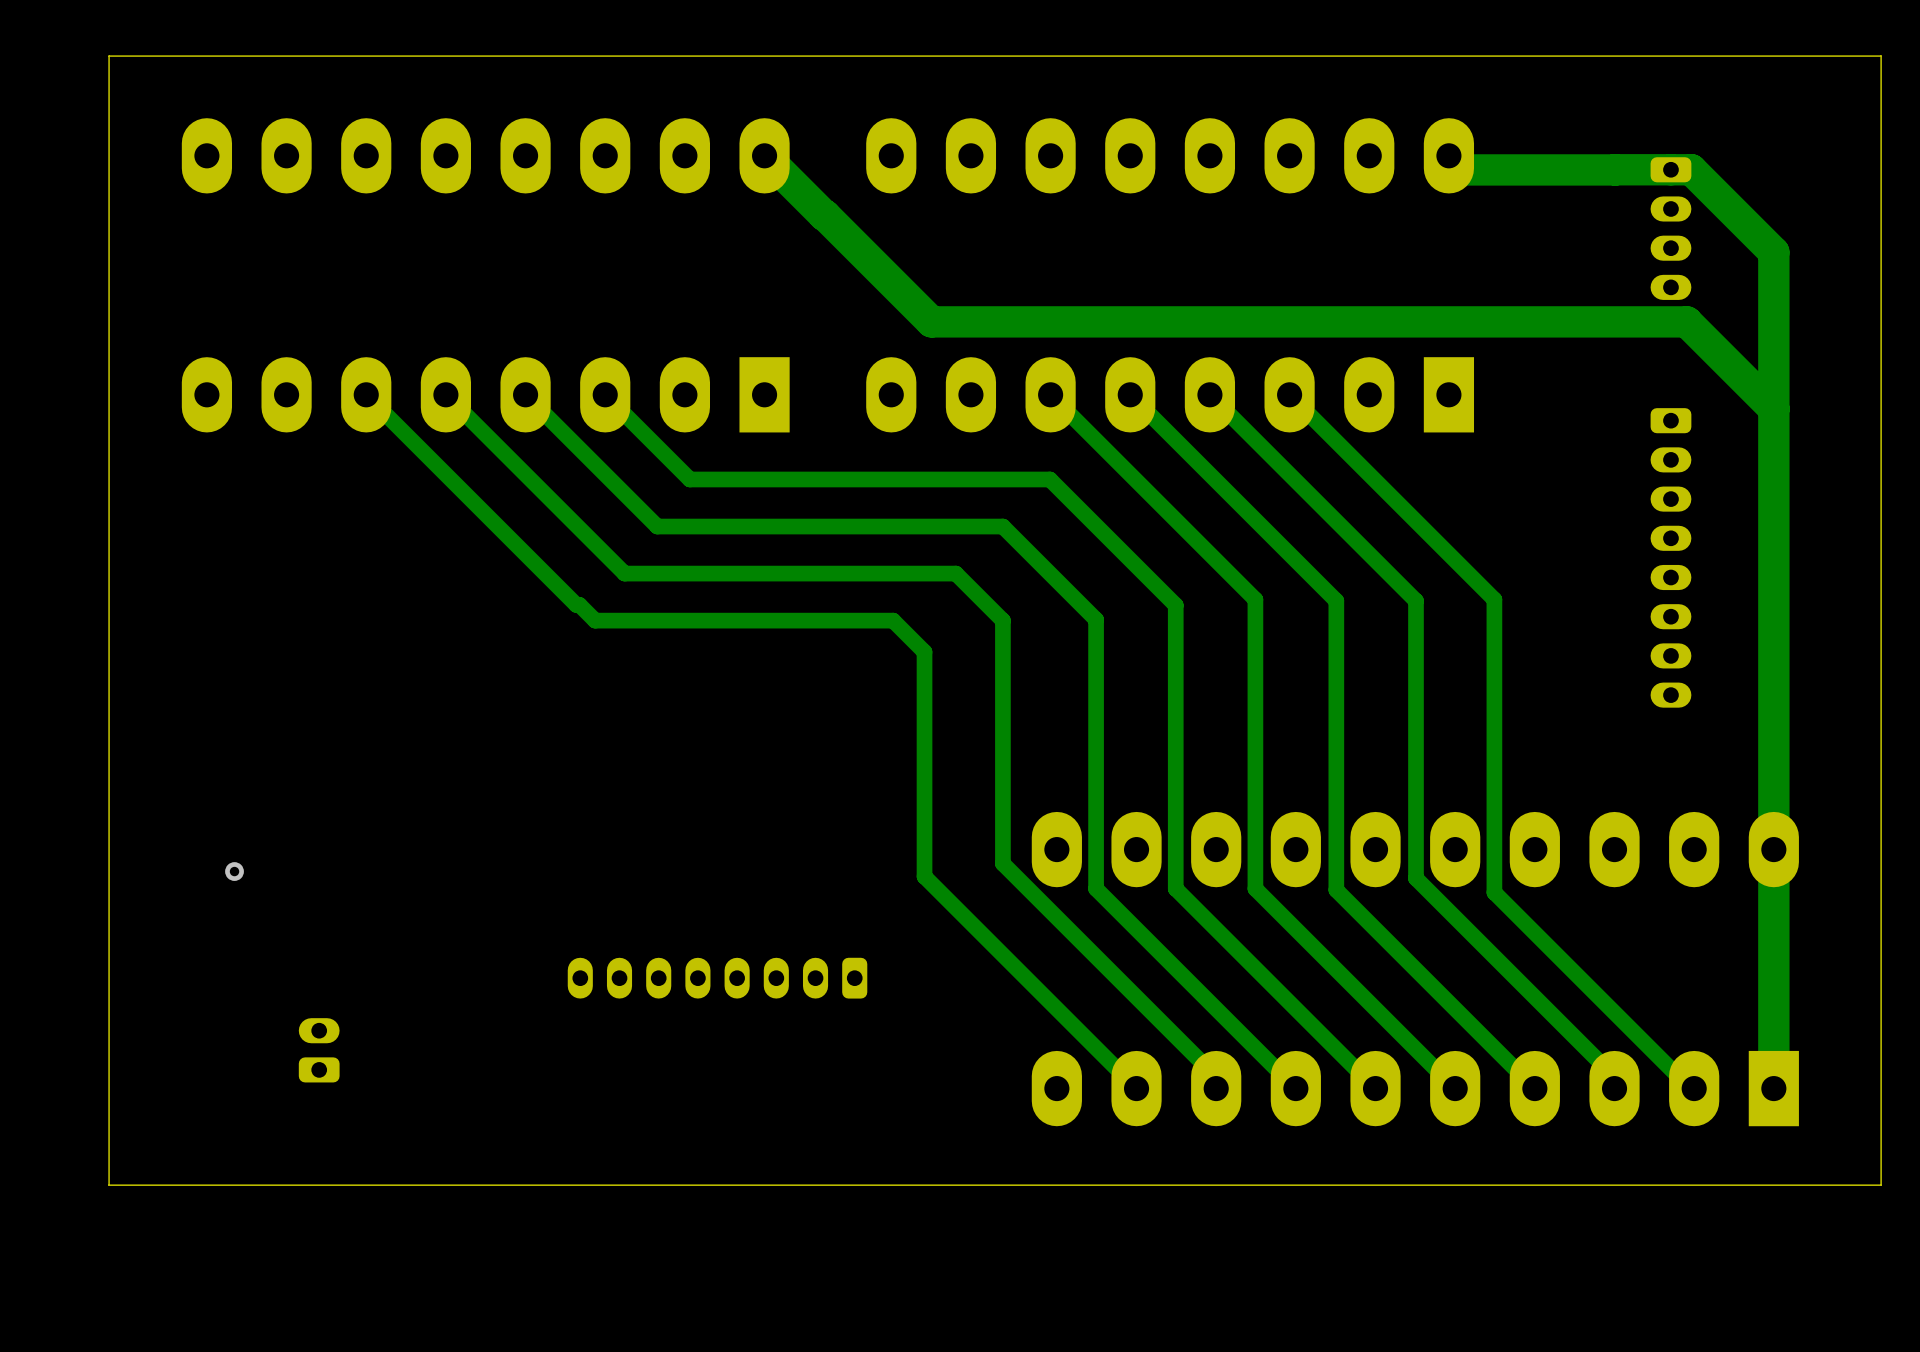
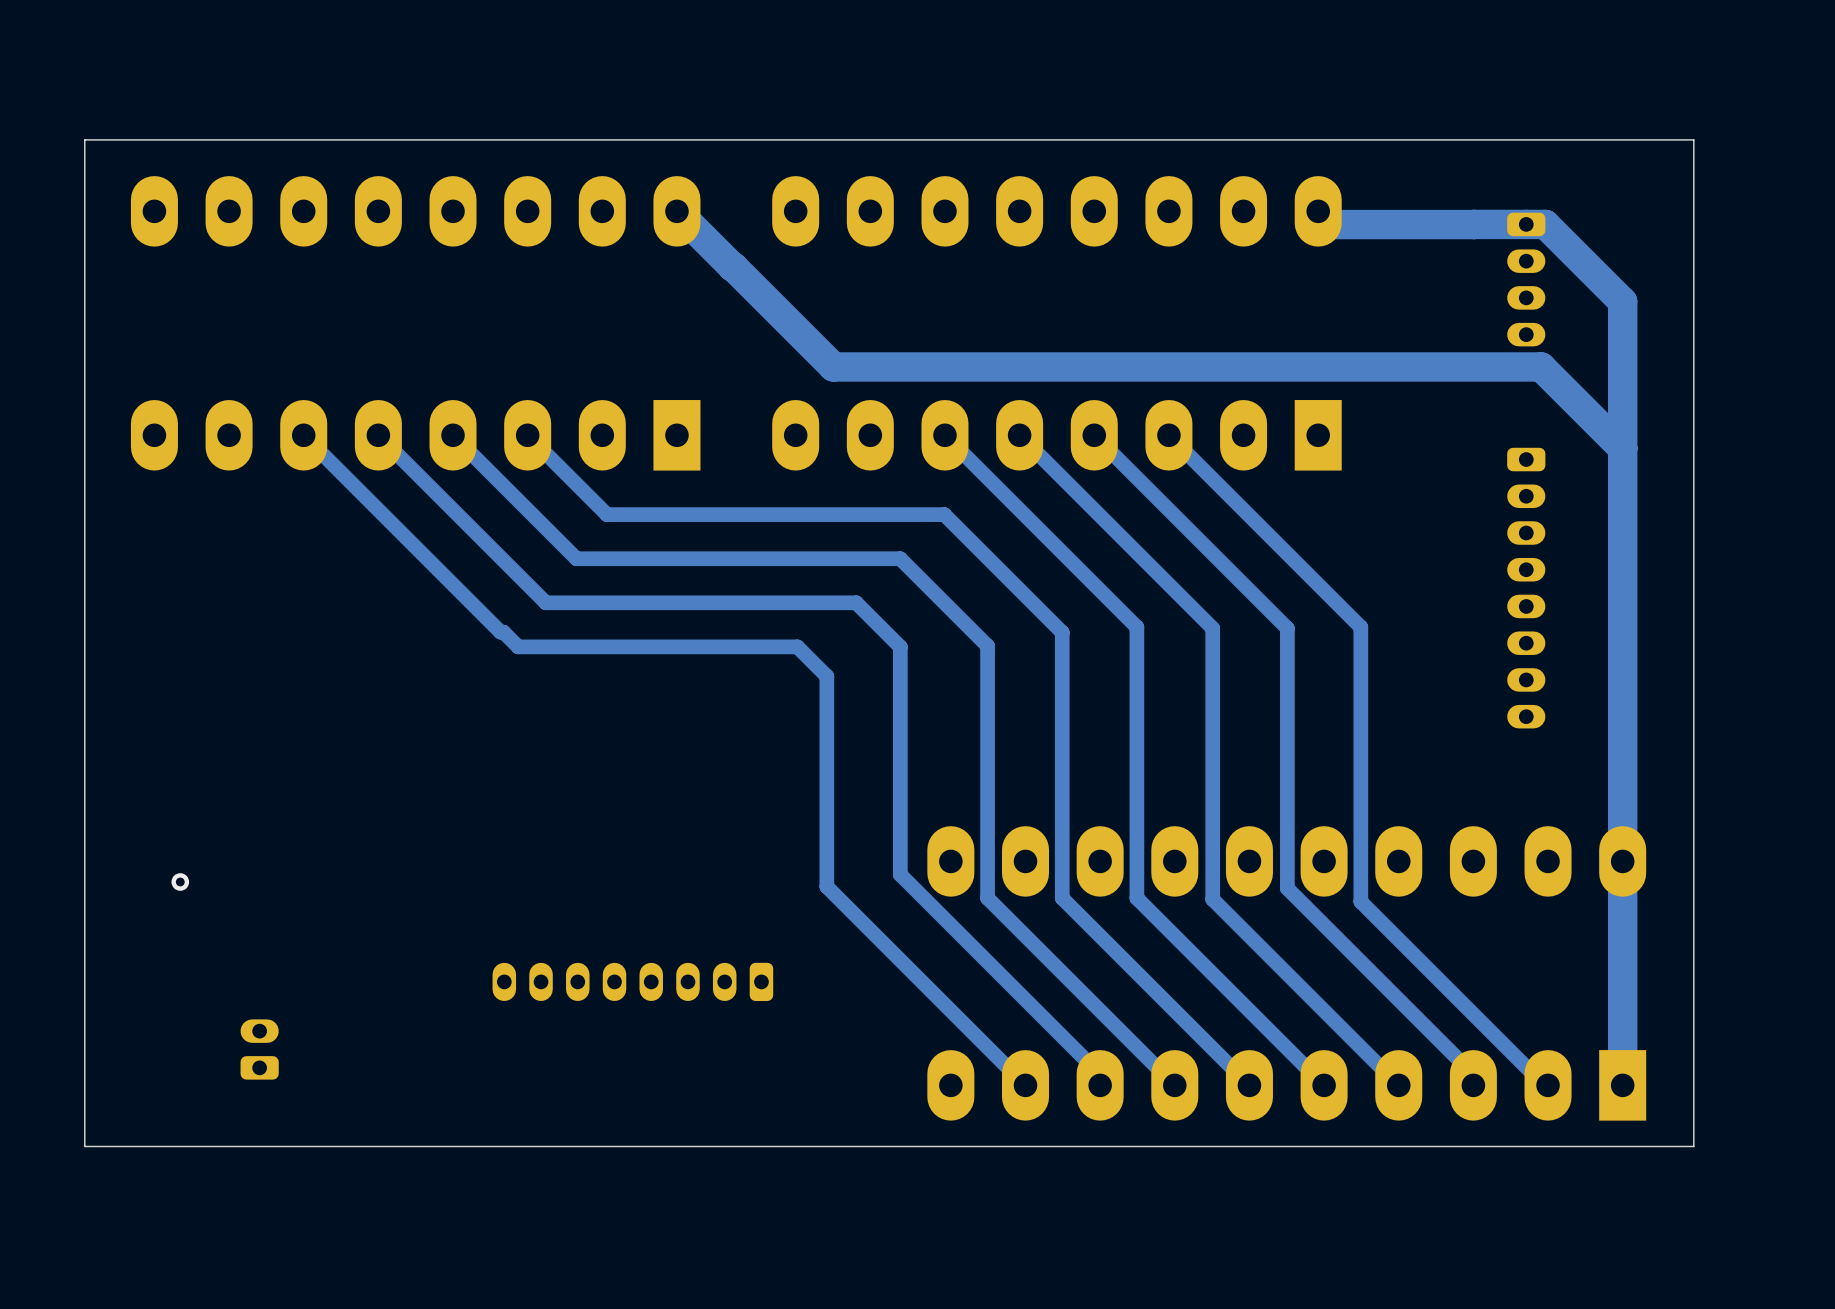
board edge: (1881, 56) (109, 56) (109, 1185) (1881, 1185) (1881, 56) -> (1693, 139) (1693, 1146) (84, 1146) (84, 139) (1693, 139)

